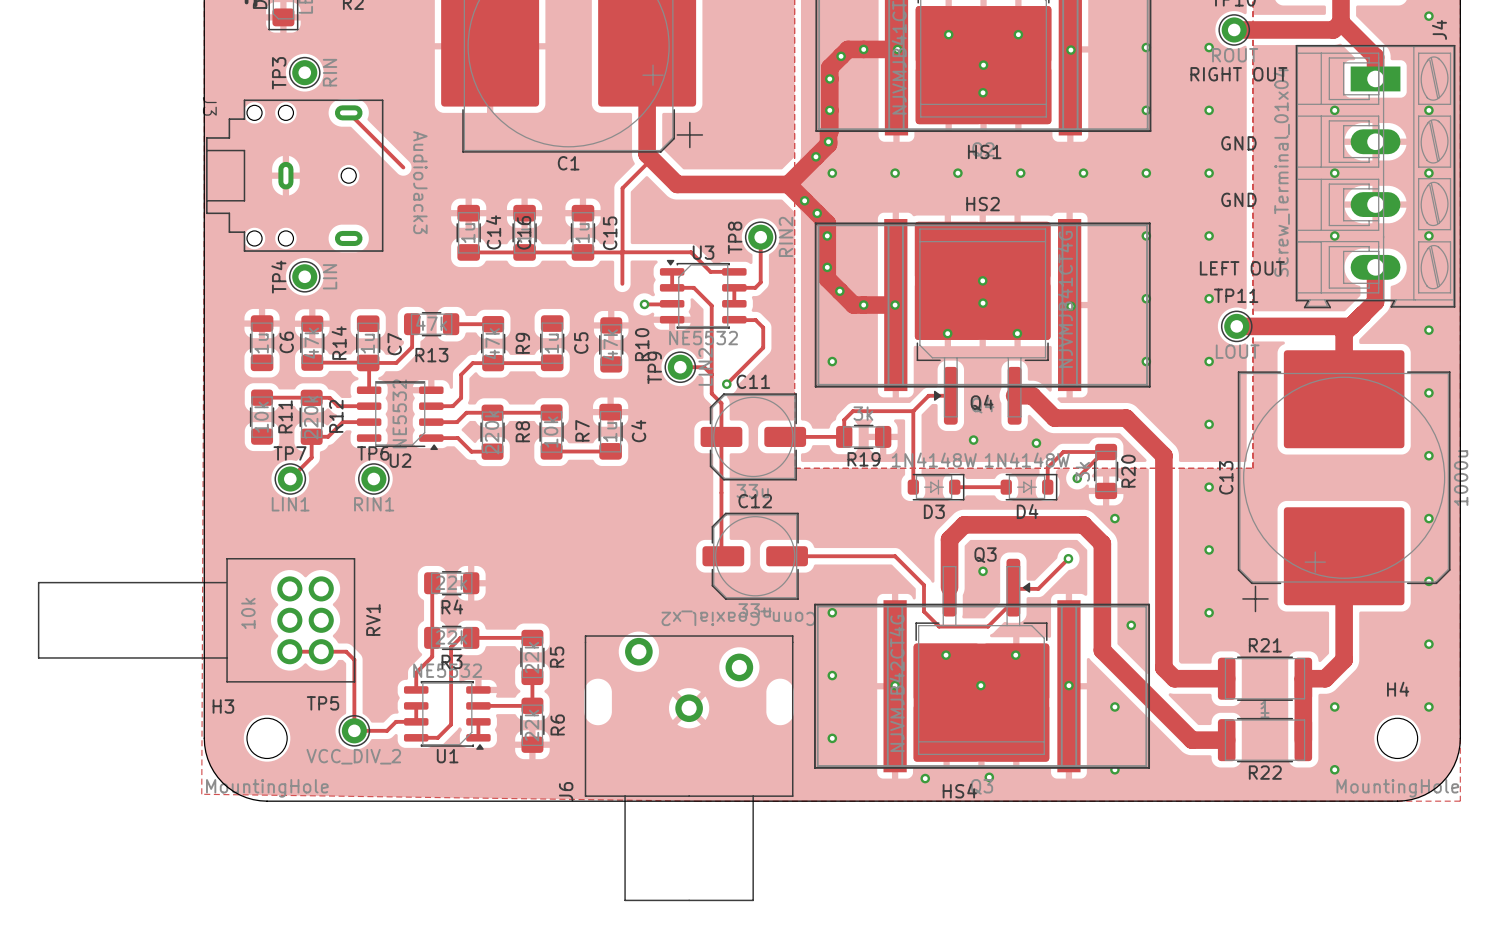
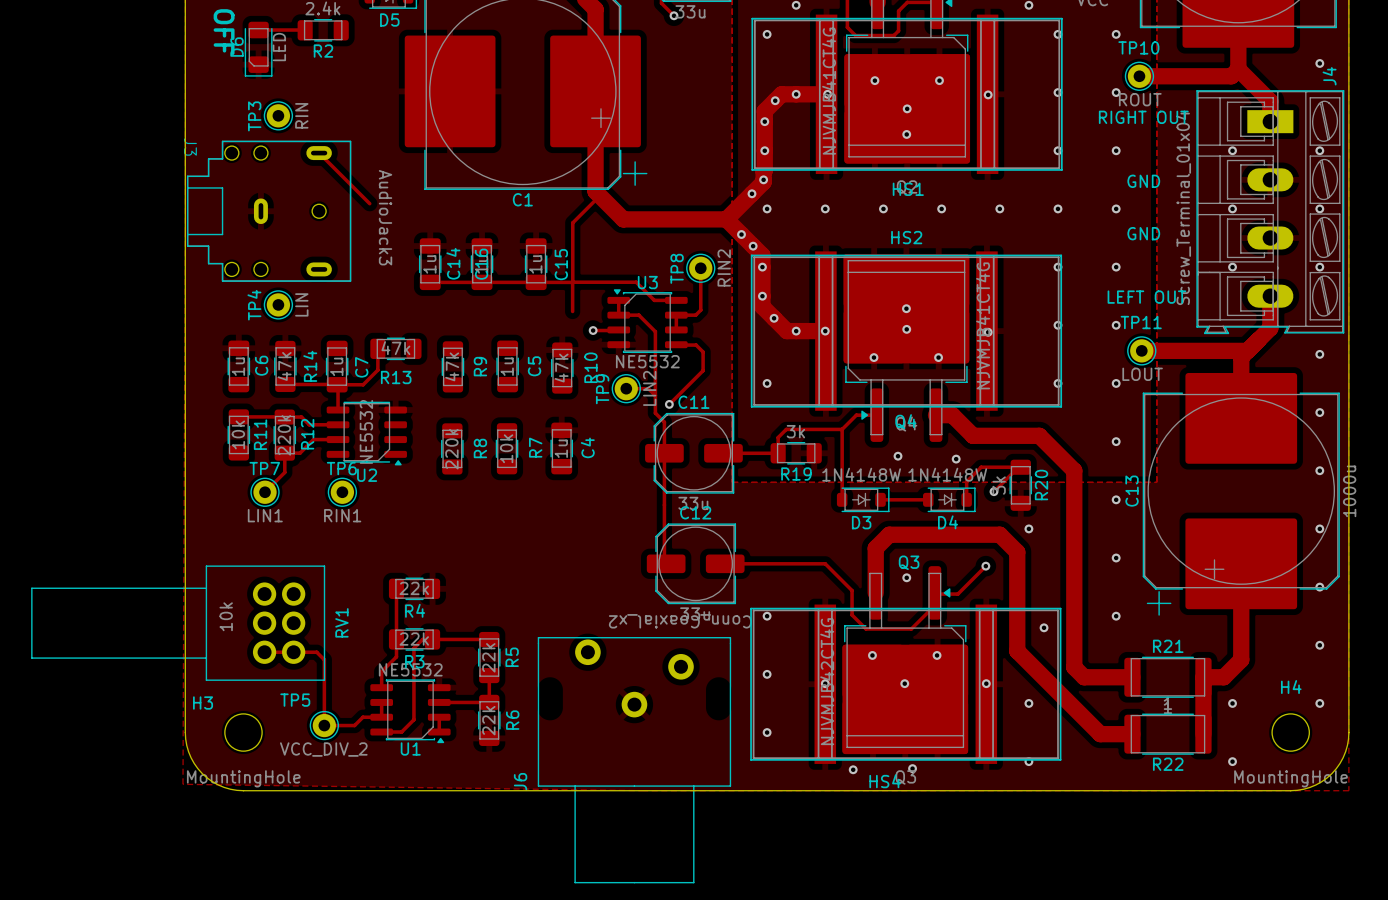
track: (451, 324) (493, 324) -> none
track: (552, 362) (472, 363) (461, 374) (461, 397) (452, 406) (431, 406) -> none
track: (551, 412) (466, 412) (457, 422) (431, 422) -> none
track: (431, 438) (457, 438) (471, 451) (492, 451) -> none
track: (551, 451) (610, 451) -> none

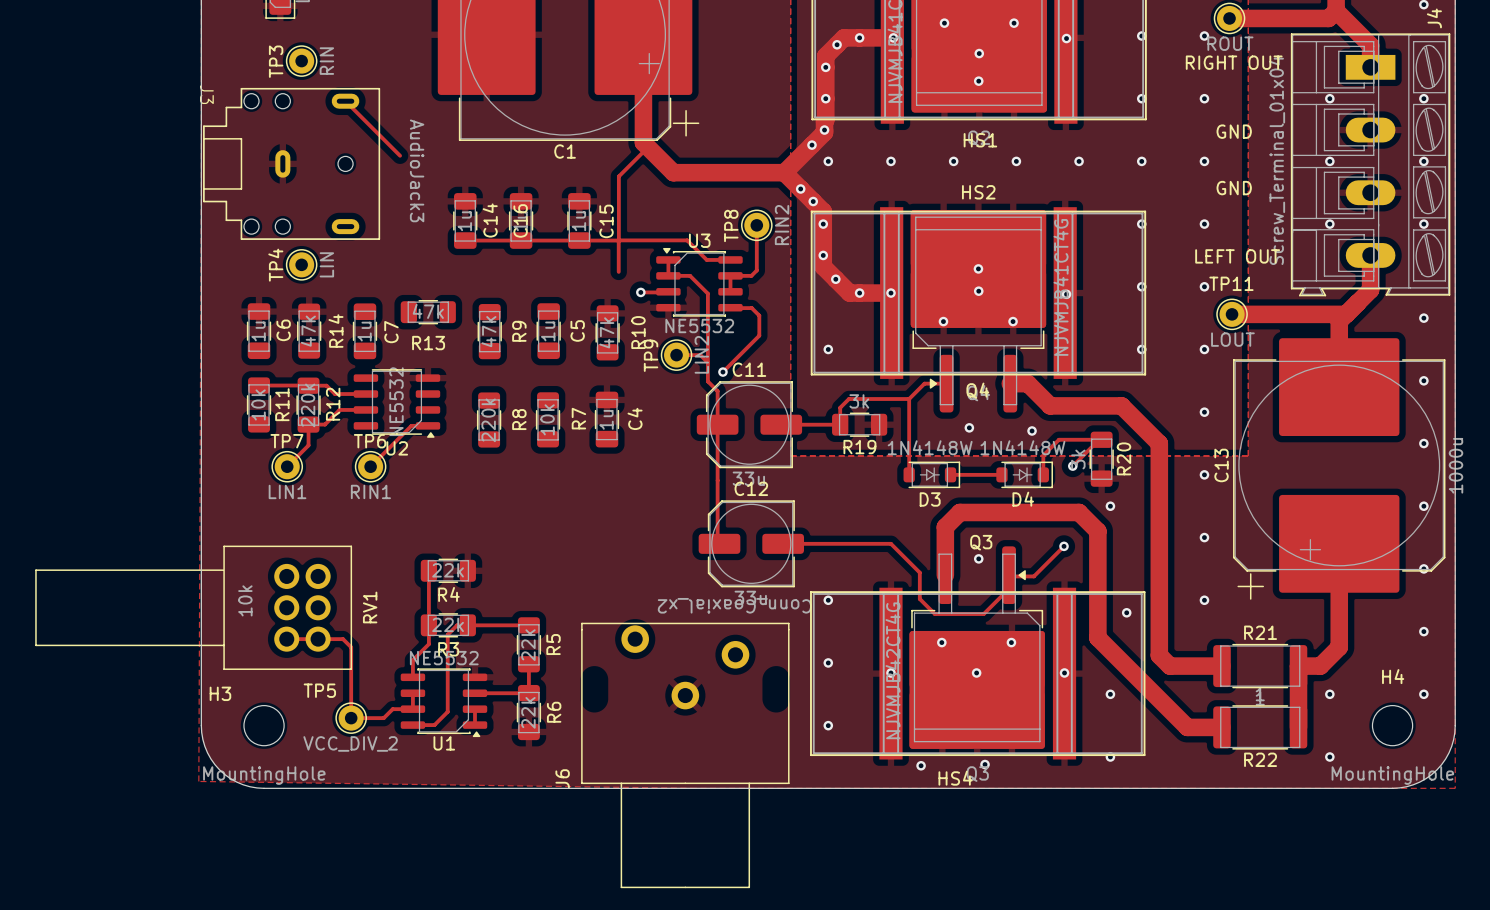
track: (377, 348) (377, 370) (363, 384) (285, 384) -> none
track: (337, 384) (338, 410) -> none
track: none -> (427, 425) (411, 425) (370, 466)

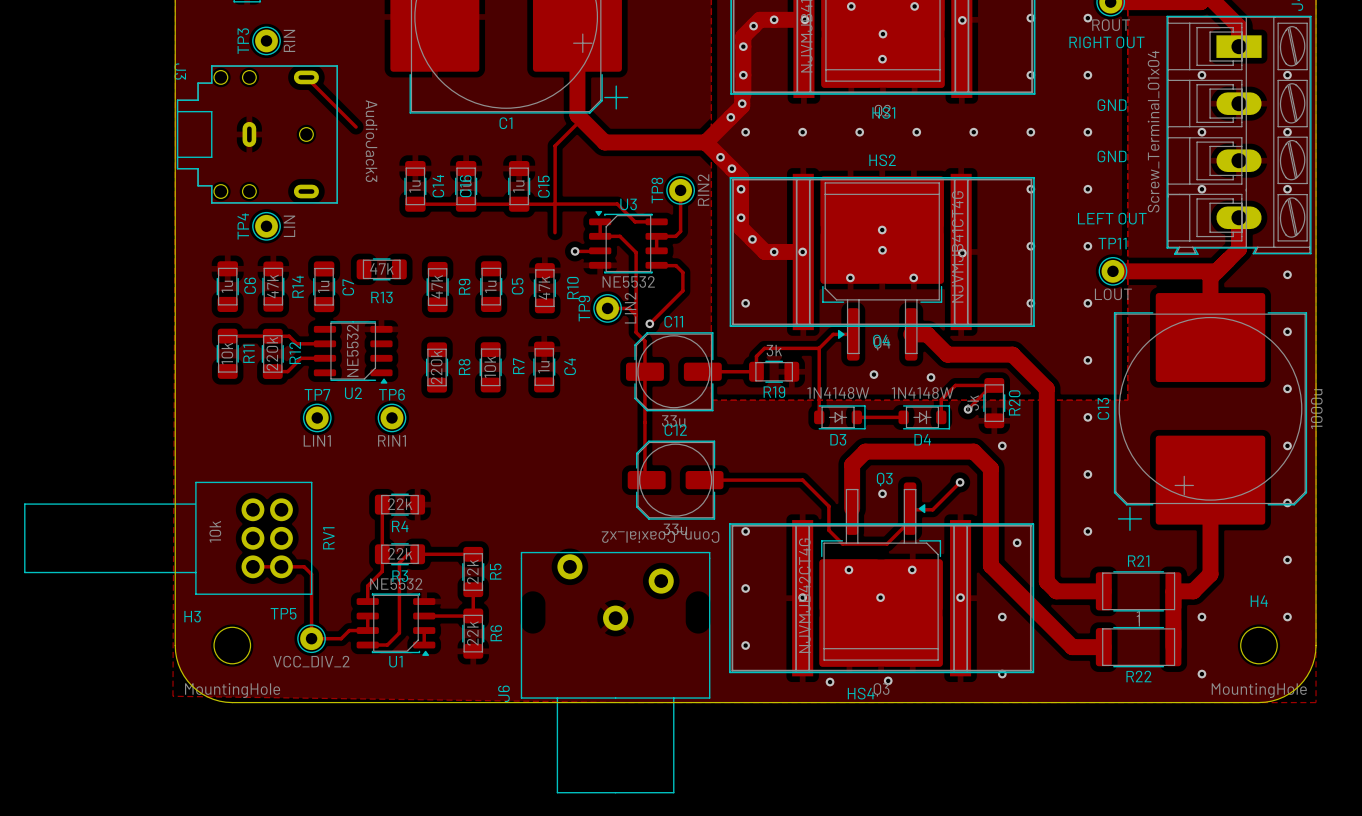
track: (308, 424) (308, 445) (287, 466) -> none
track: (427, 425) (411, 425) (370, 466) -> none
TP7 position: (287, 466) -> (317, 417)
TP6 position: (370, 466) -> (391, 417)

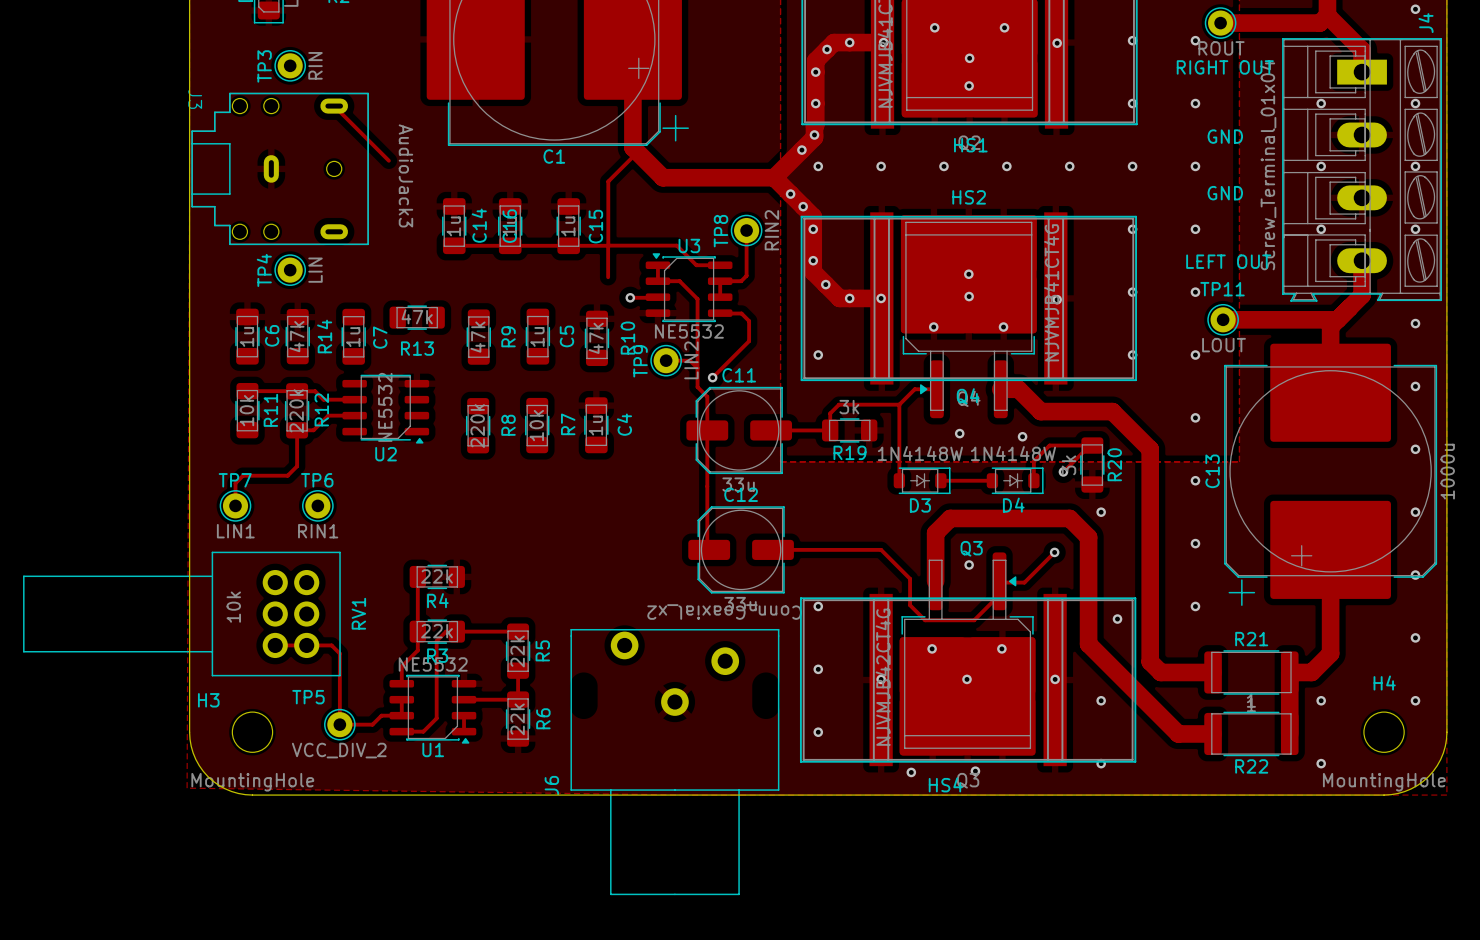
track: none -> (297, 430) (297, 466) (287, 475) (243, 475) (235, 483) (235, 505)
TP7 position: (317, 417) -> (235, 505)
TP6 position: (391, 417) -> (317, 505)

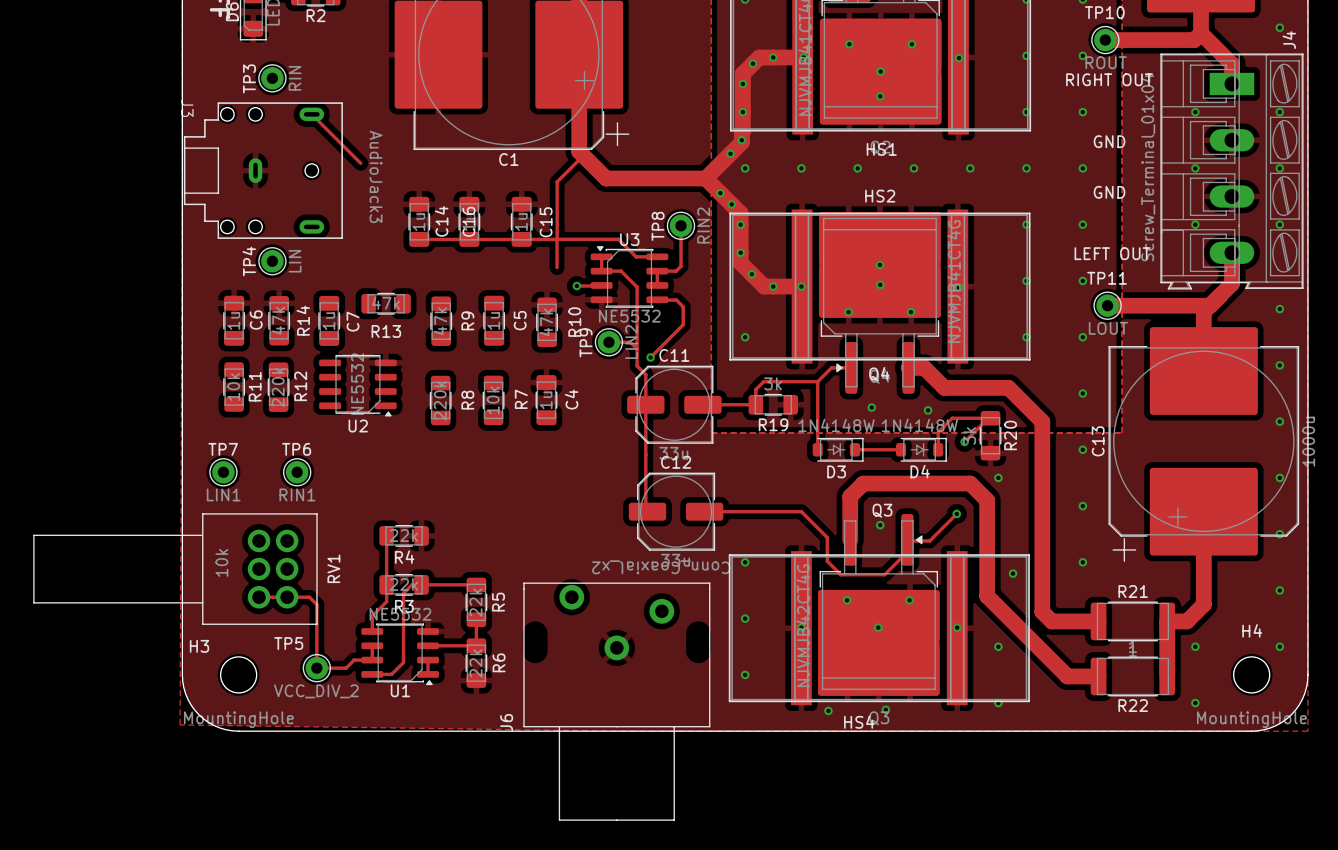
track: (247, 391) (296, 391) -> none
track: (297, 391) (315, 391) (323, 399) (354, 399) -> none
track: (354, 415) (328, 415) (313, 430) (297, 430) (297, 466) (287, 475) (243, 475) (235, 483) (235, 505) -> none

